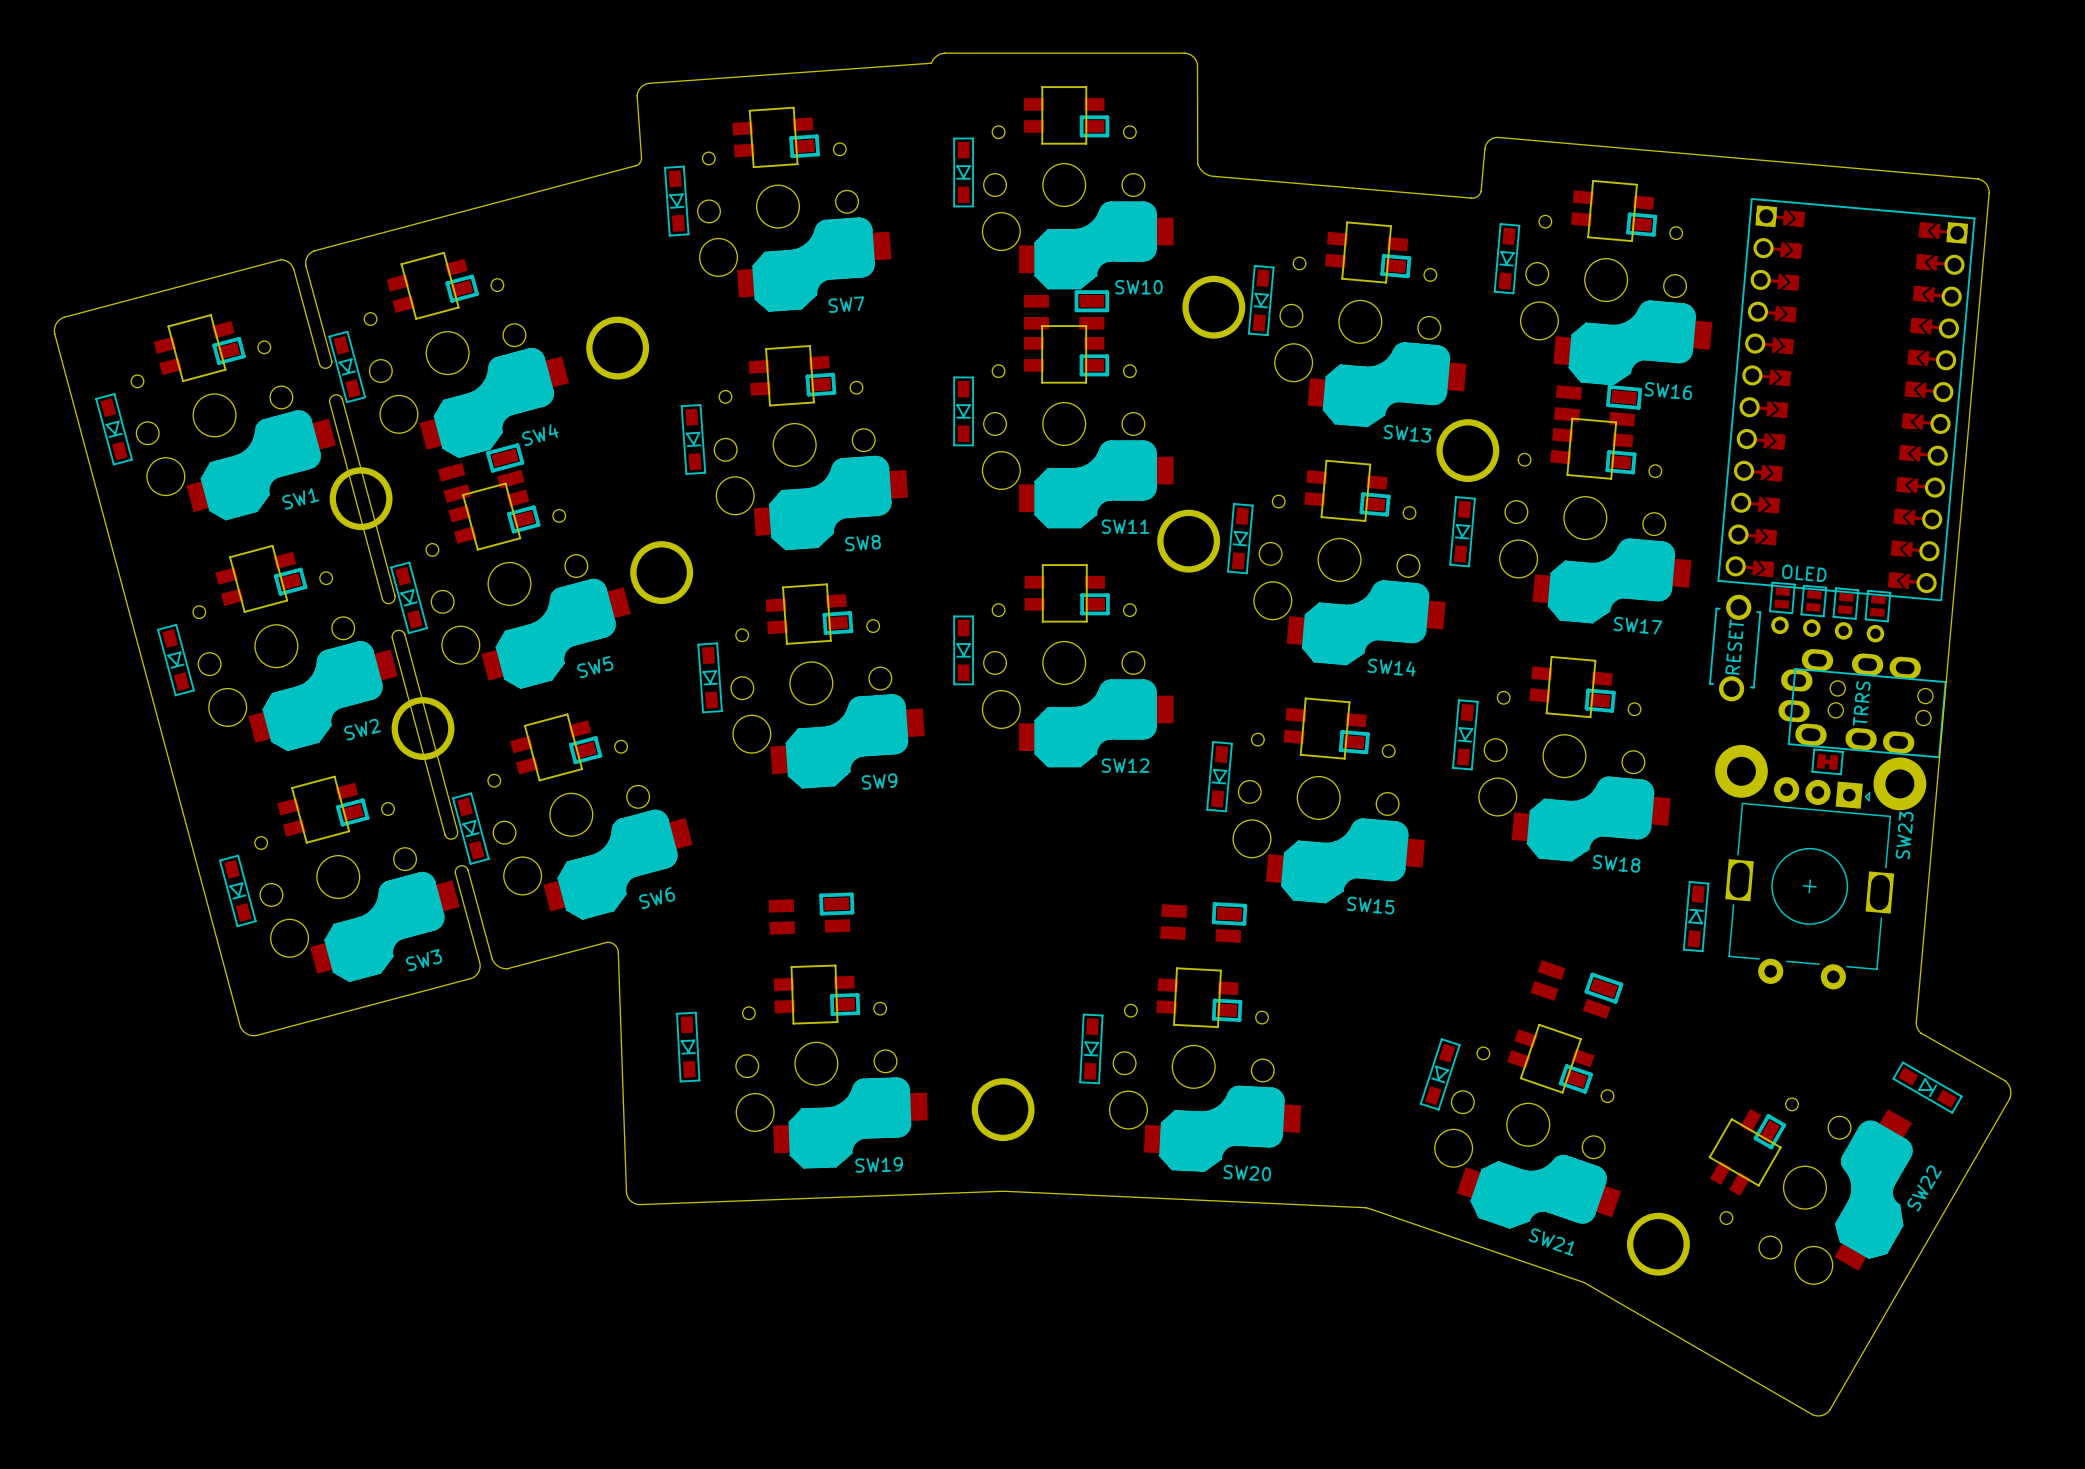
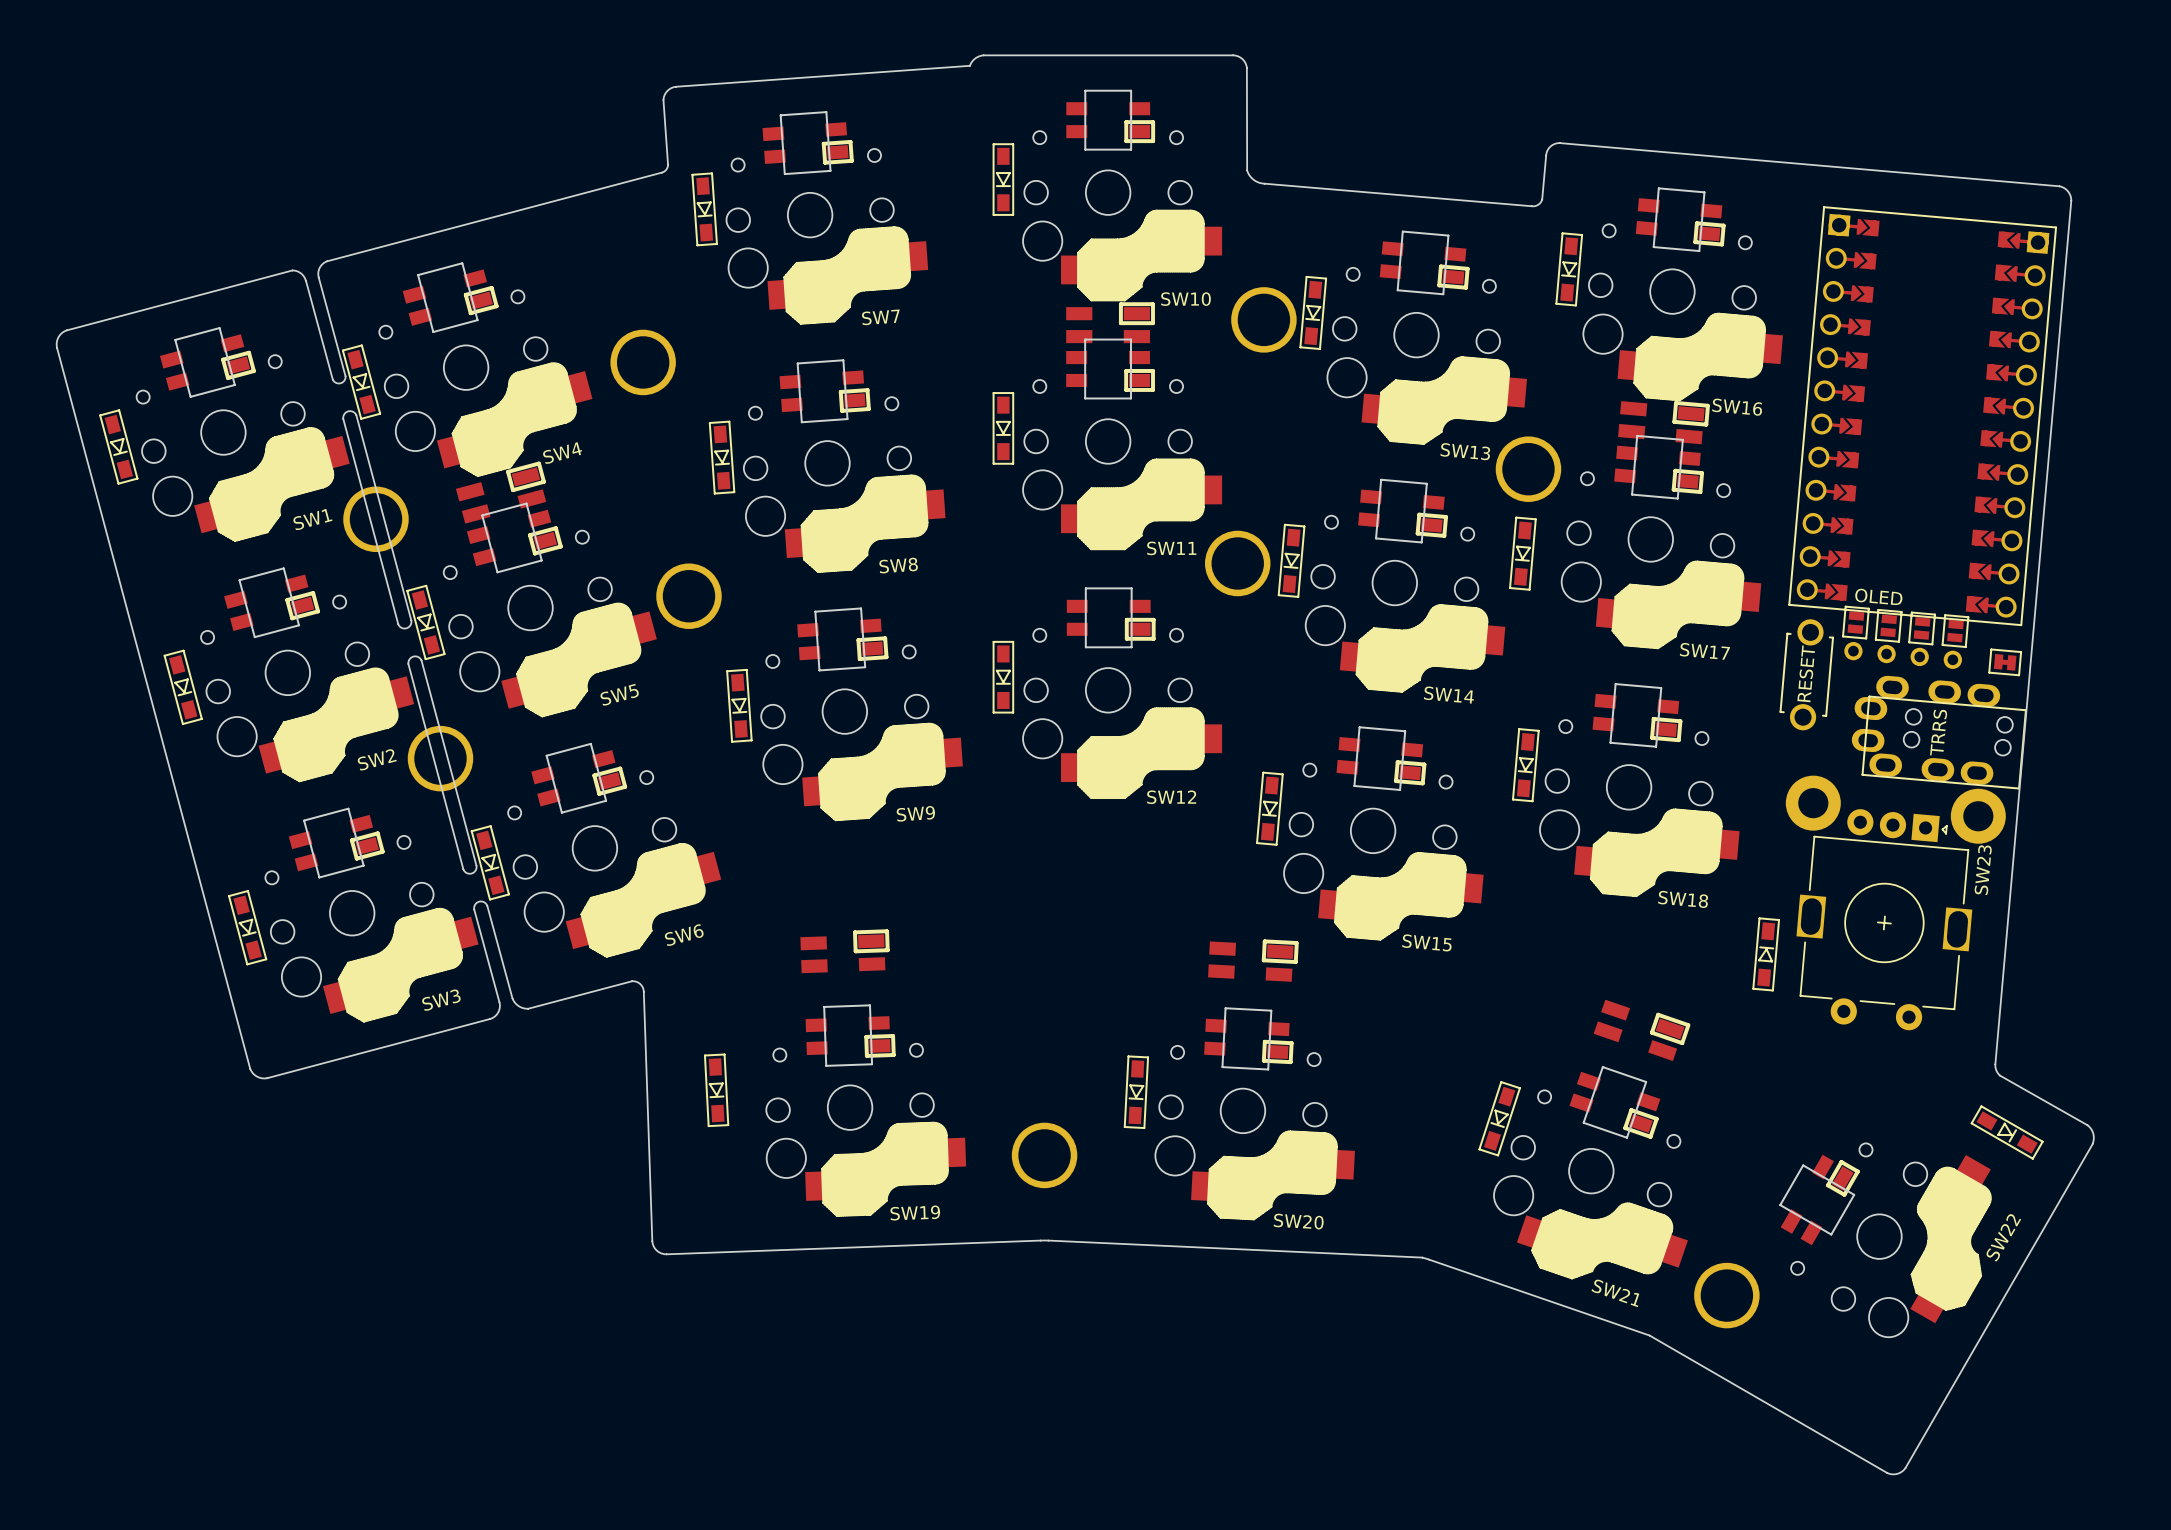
part position: (1827, 761) -> (2005, 662)

